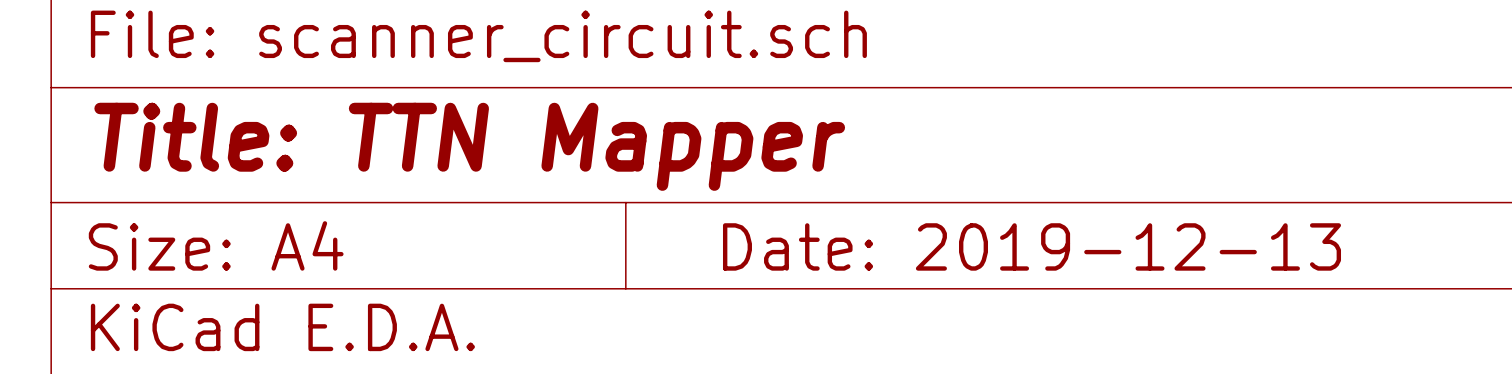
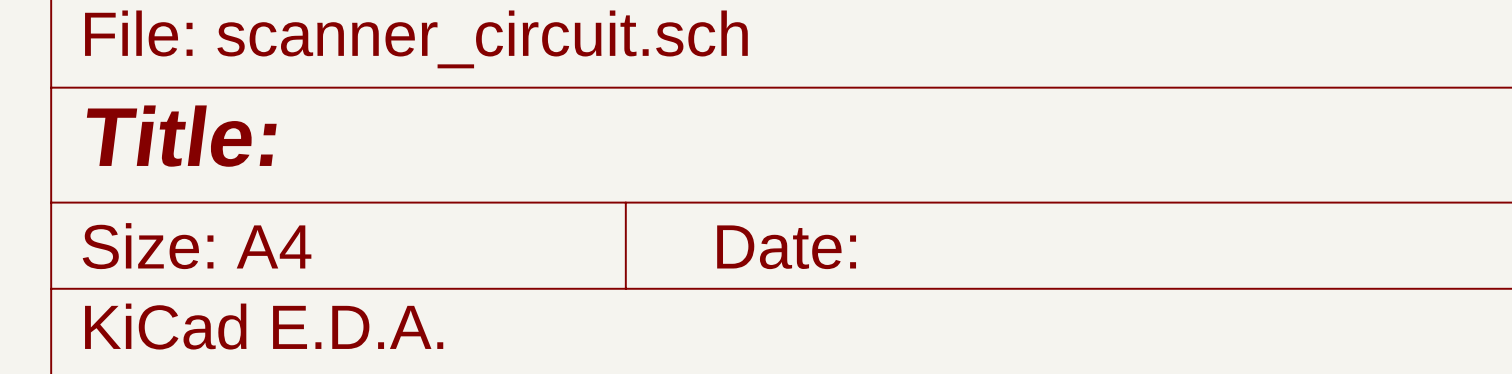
title block: Title: TTN Mapper (469, 146) -> Title: (181, 136)
title block: Date: 2019-12-13 (1031, 246) -> Date: (786, 247)

